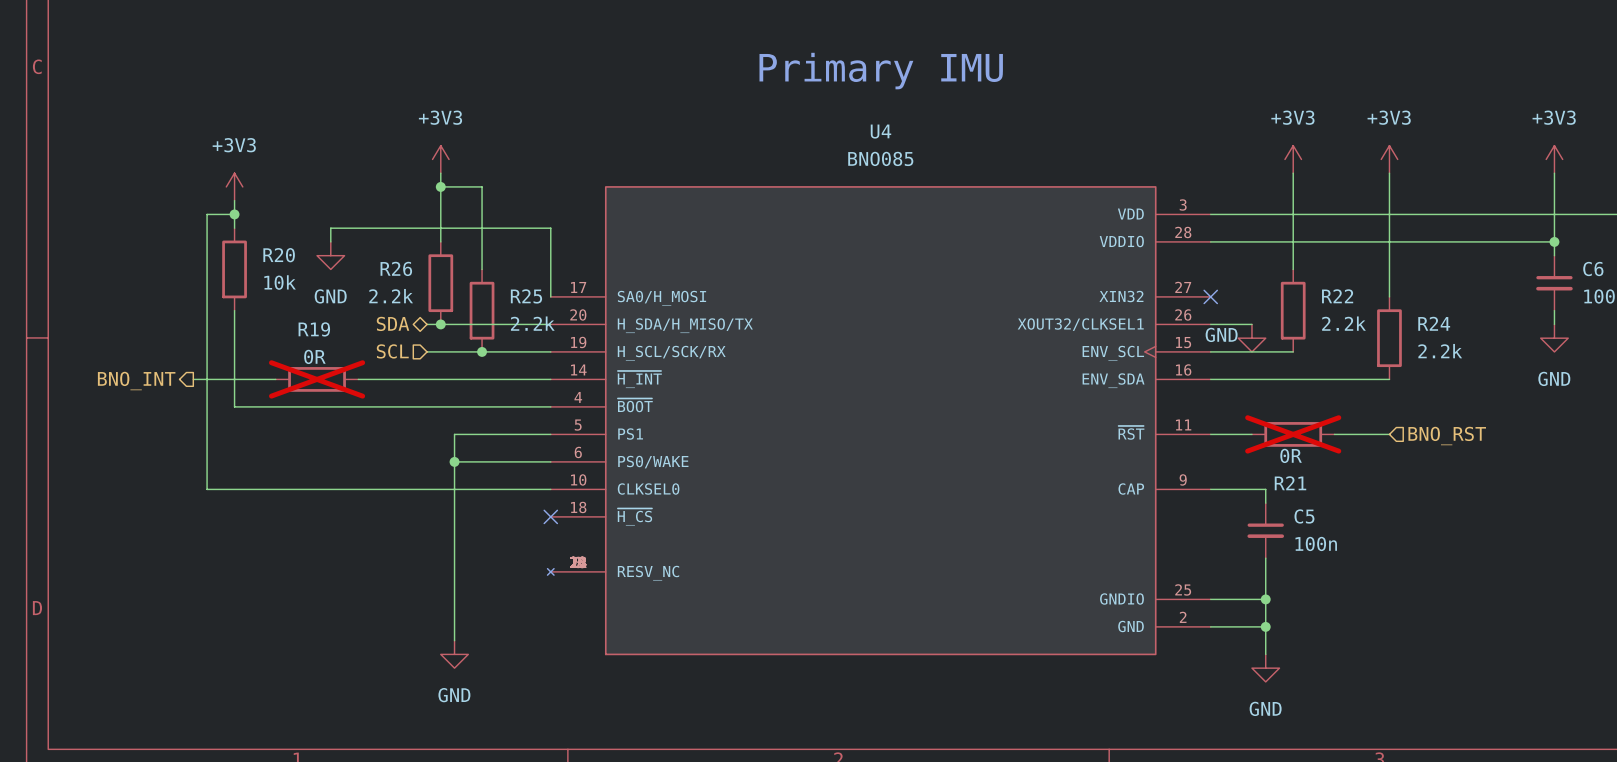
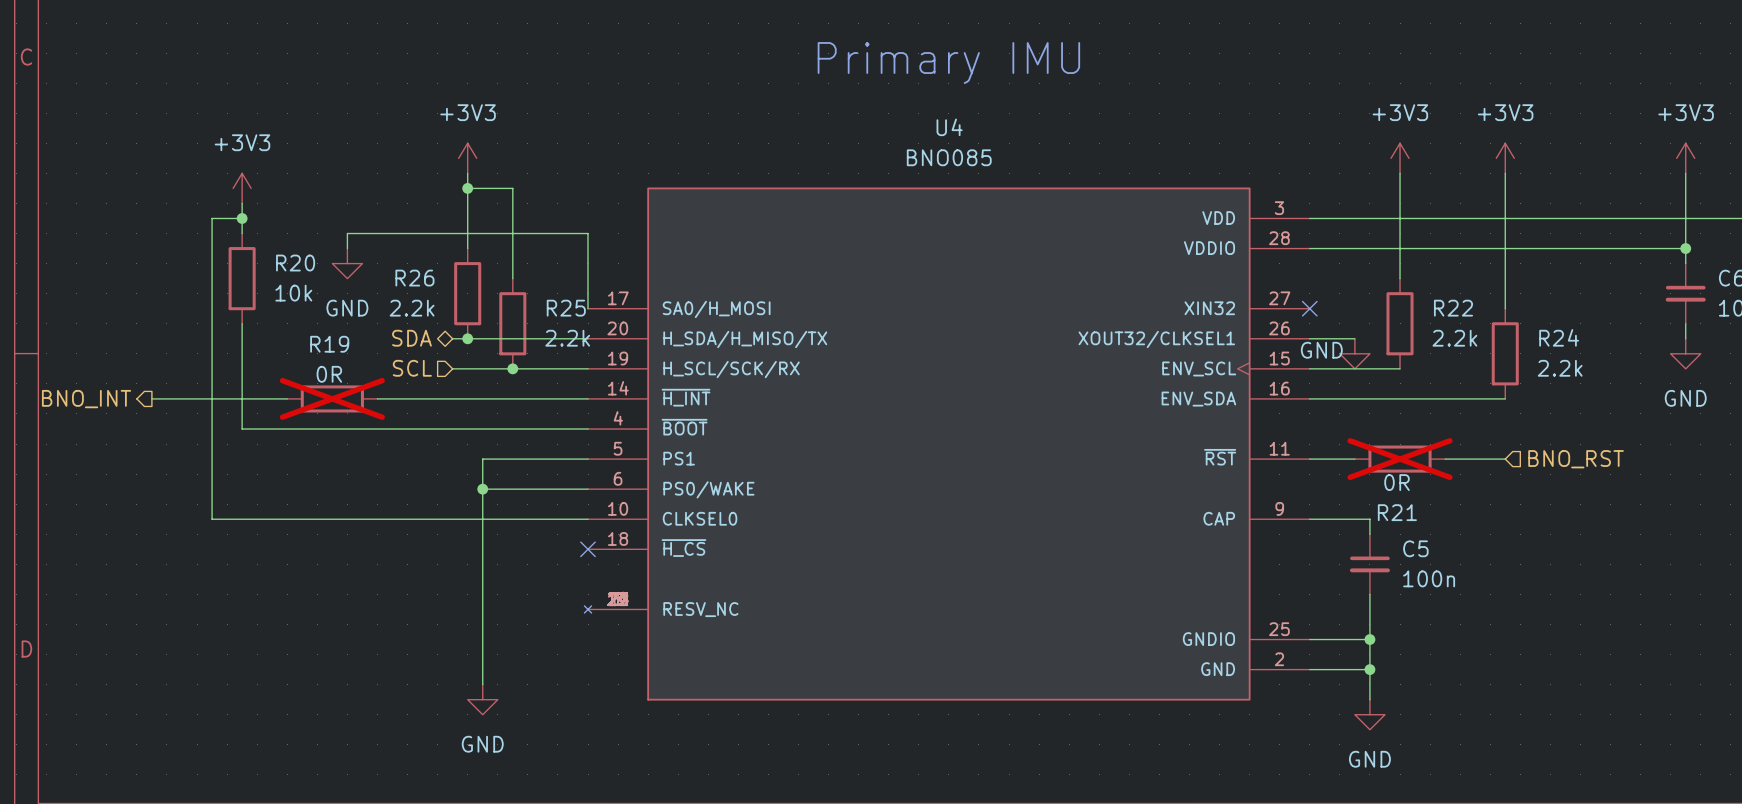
wire: none -> (151, 398) (197, 398)
hierarchical label position: BNO_INT (136, 381) -> BNO_INT (86, 399)

